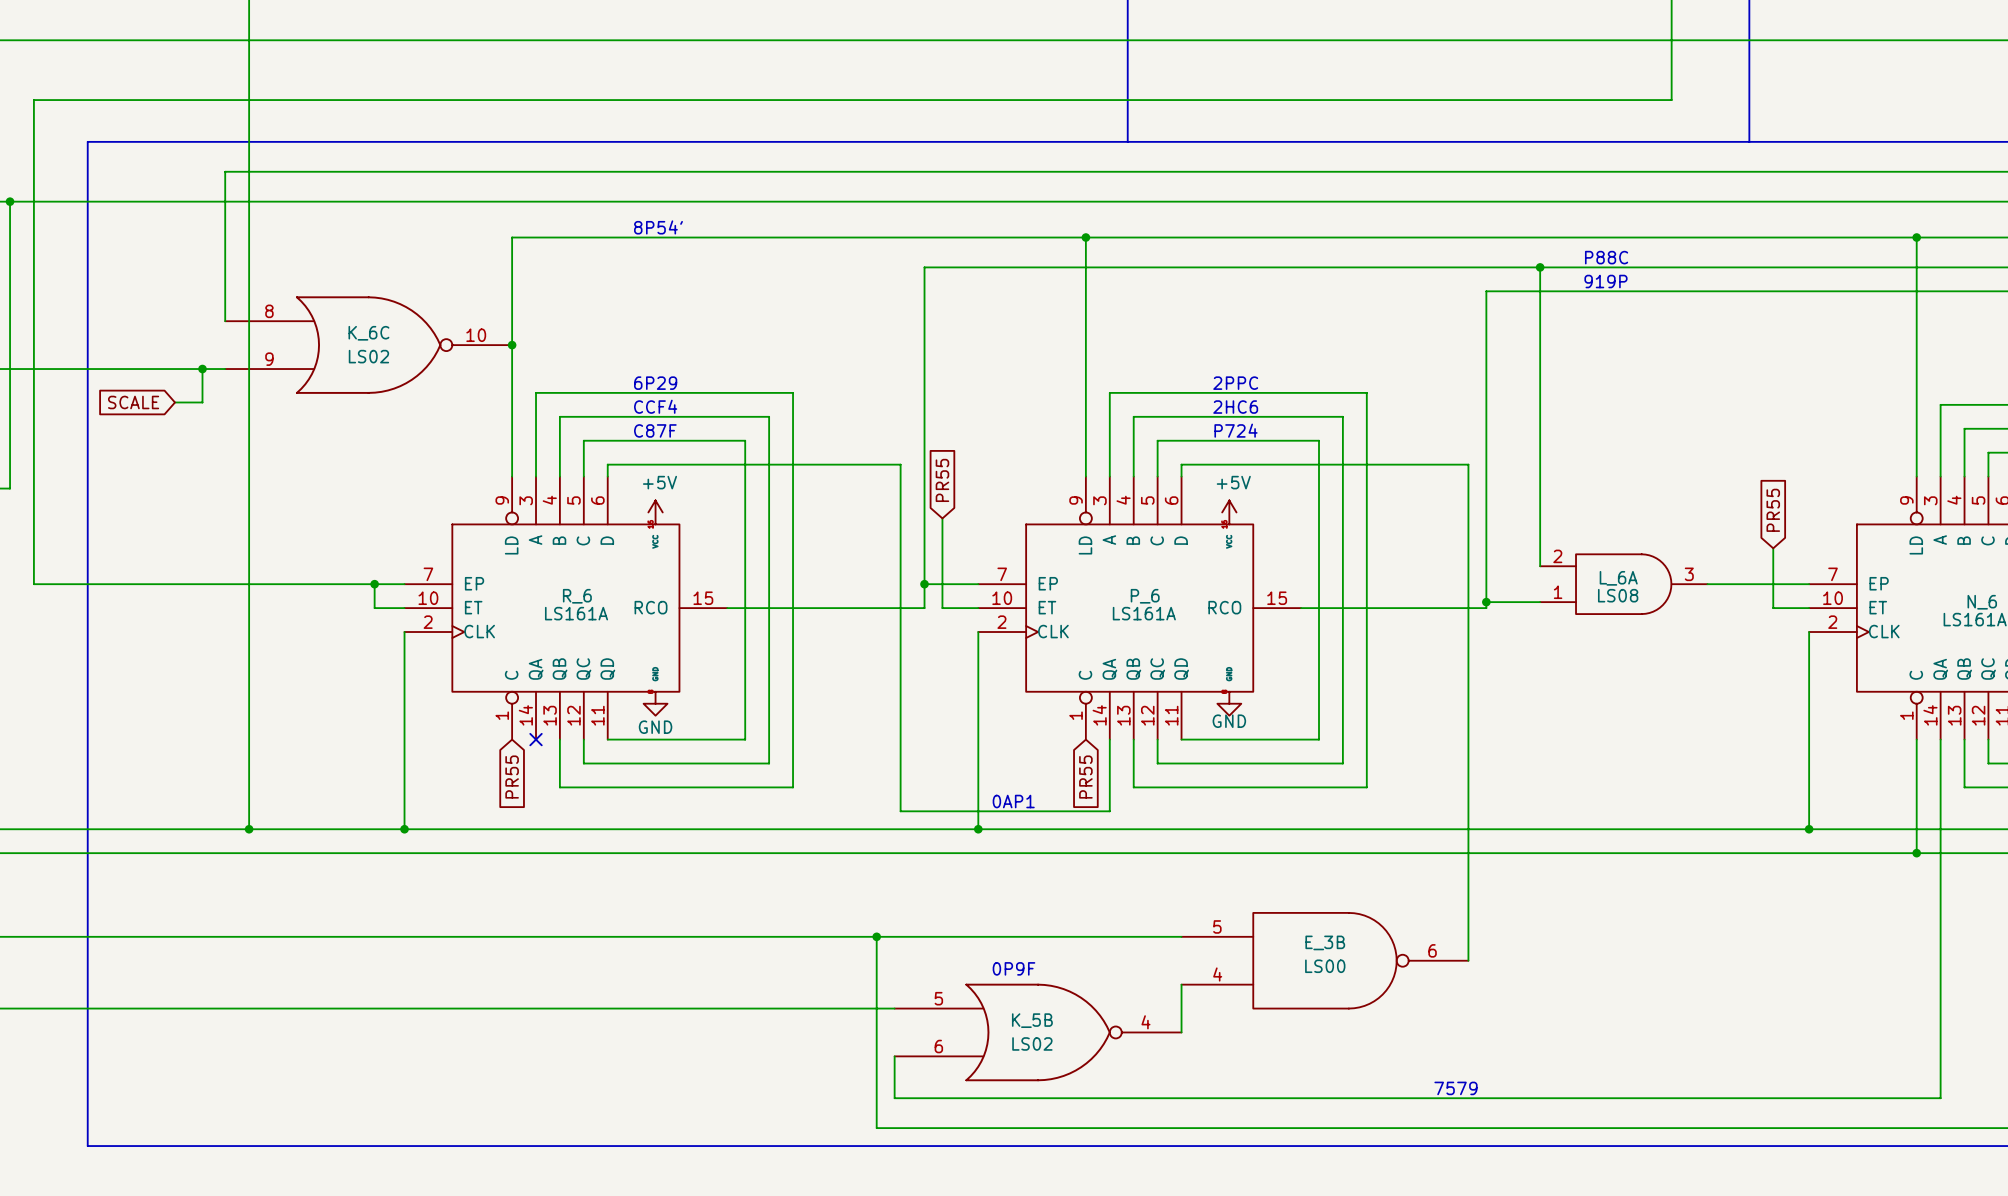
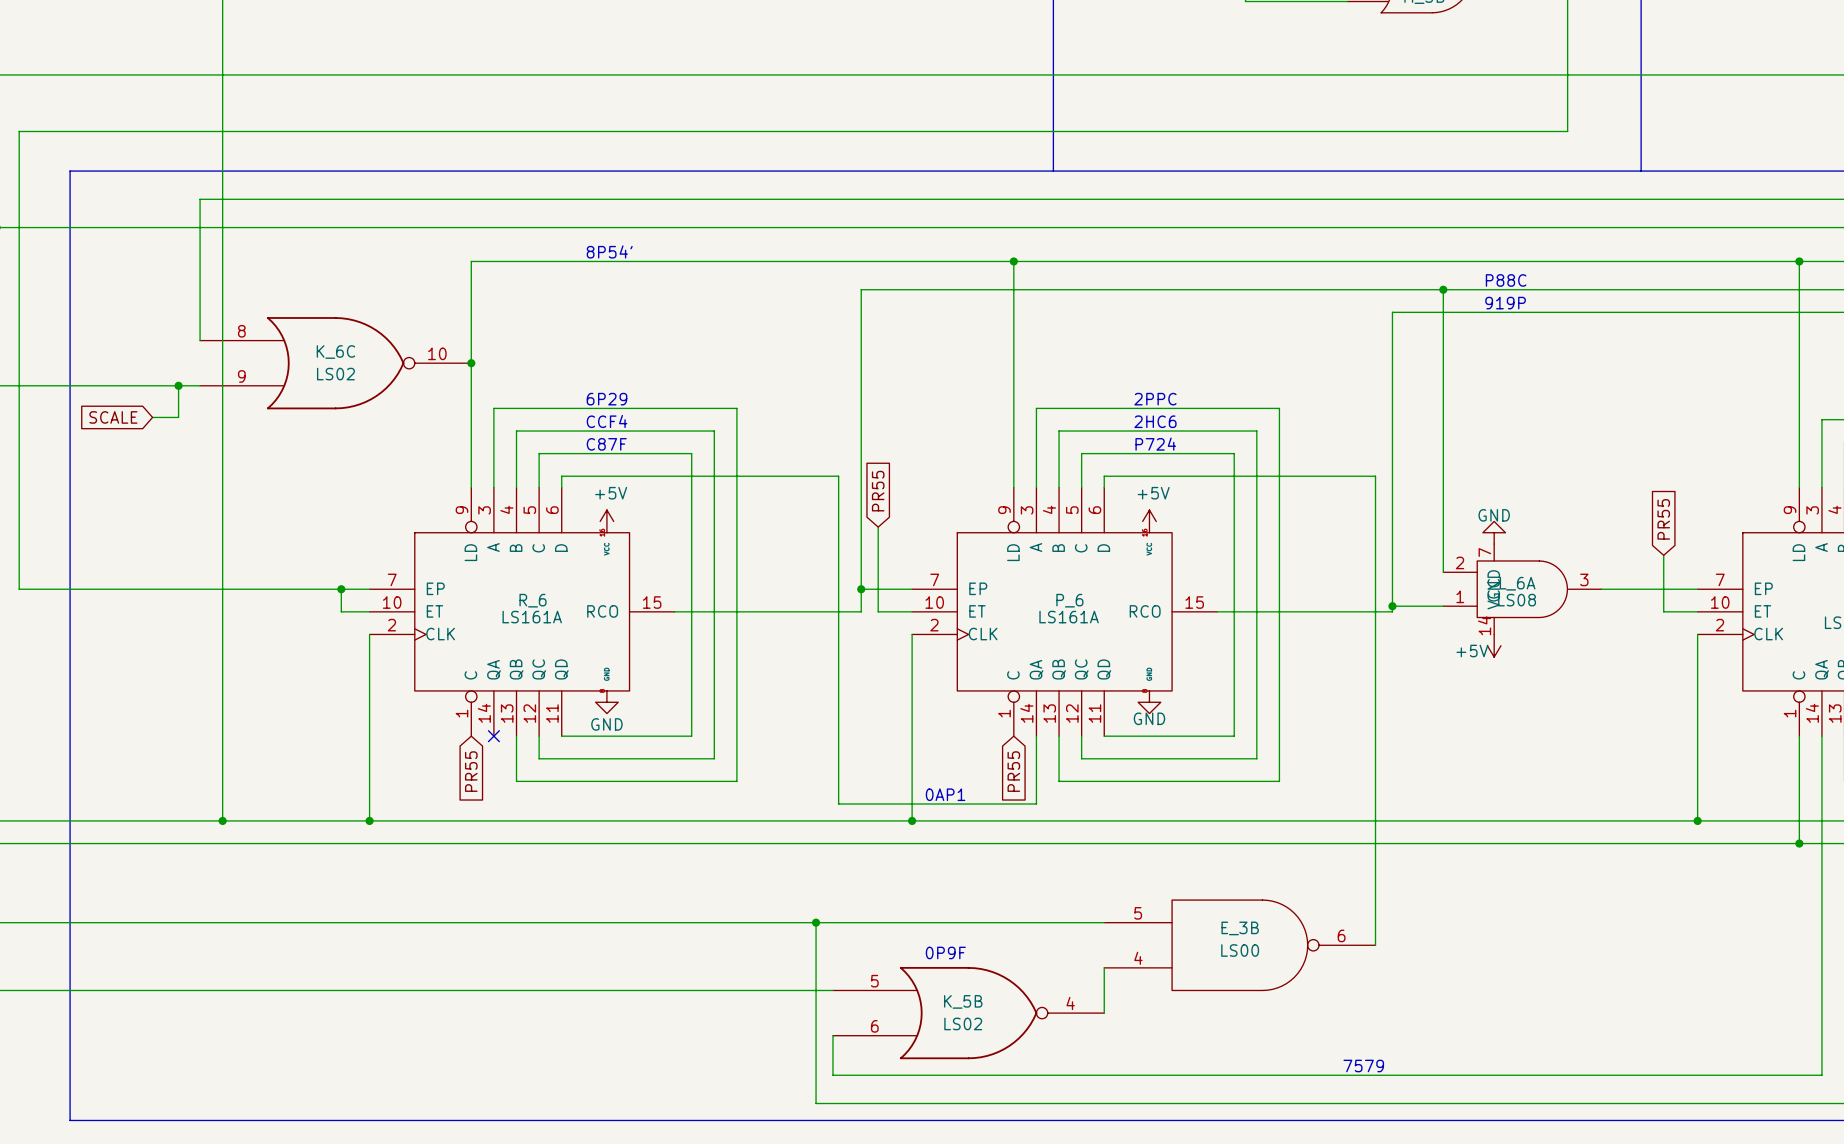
power symbol: none -> GND (1494, 532)
L_6A symbol: [1540, 554, 1708, 615] -> [1443, 544, 1602, 635]
power symbol: none -> +5V (1494, 645)

